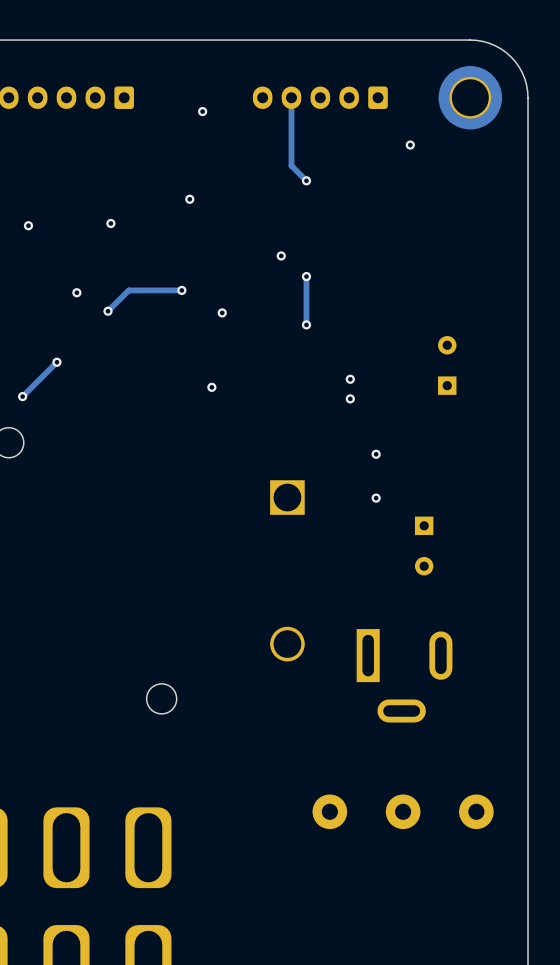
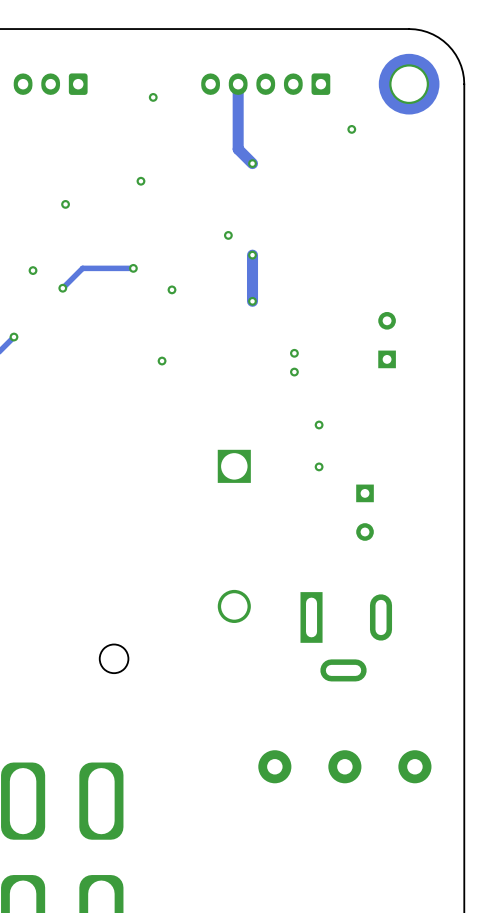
track width: thin (291, 97) (291, 165) (306, 180) -> thick (238, 84) (238, 149) (252, 163)
track width: thin (306, 276) (306, 324) -> thick (252, 255) (252, 301)

